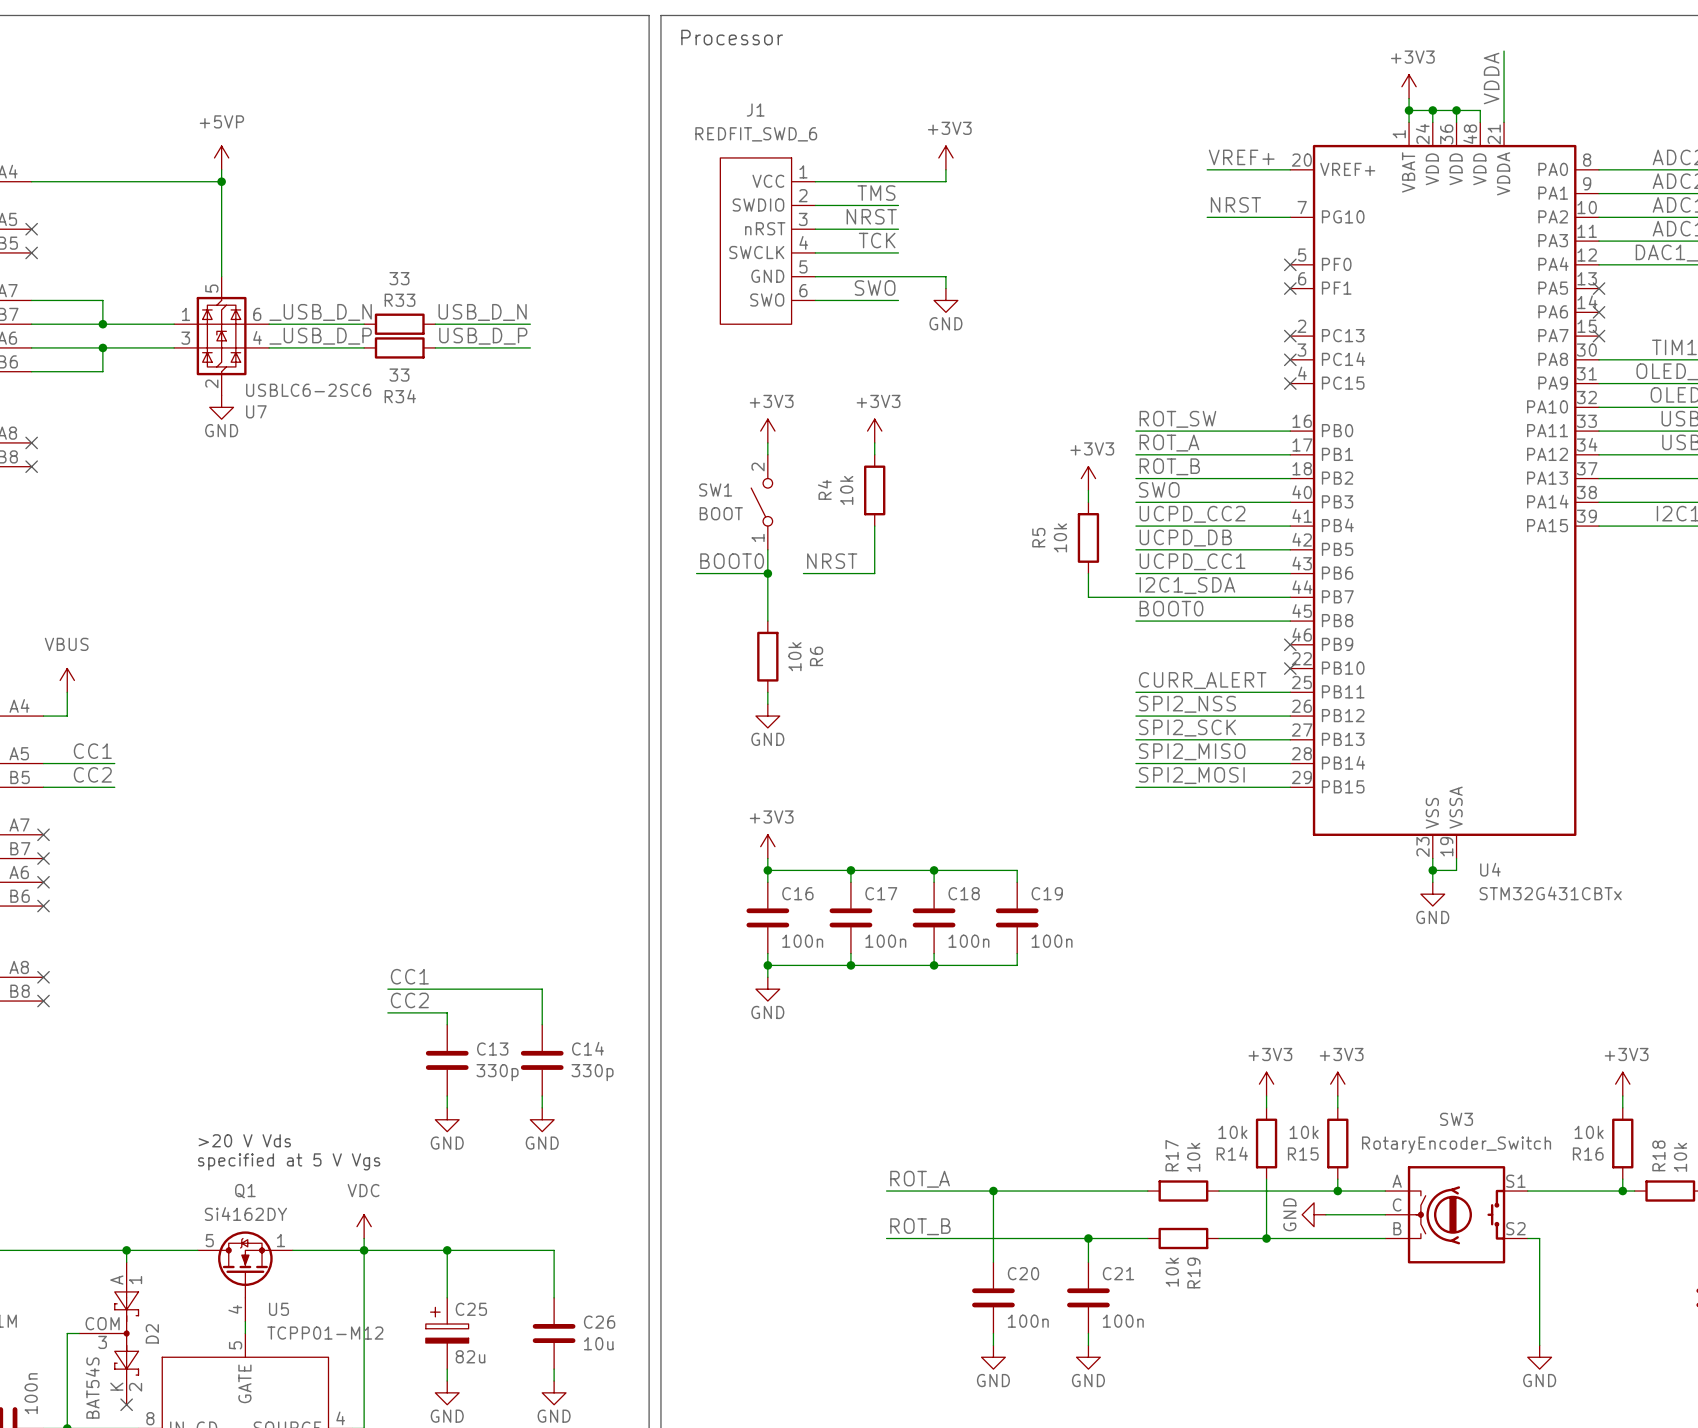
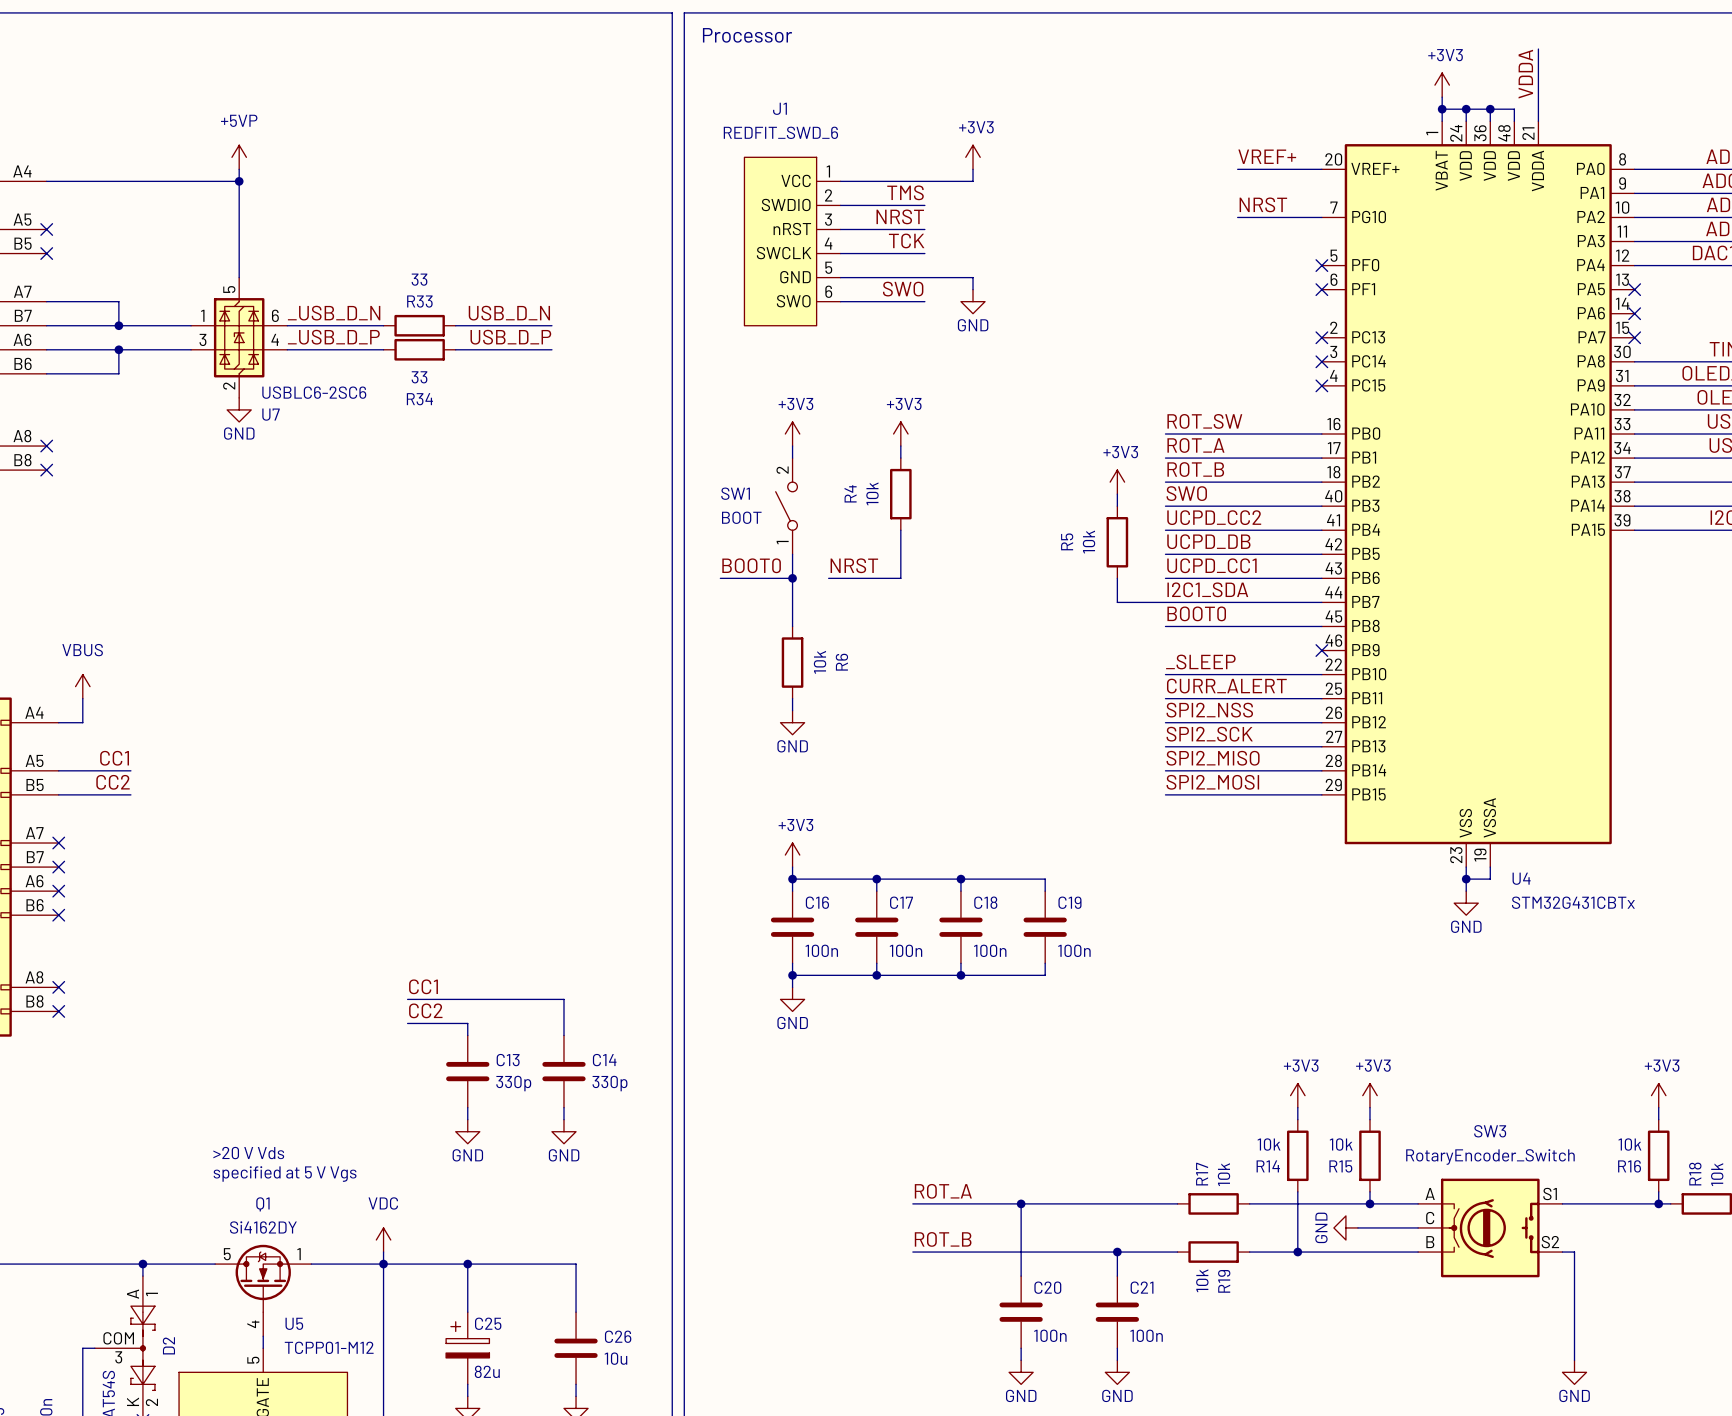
label: none -> _SLEEP (1200, 662)
wire: none -> (1165, 674) (1321, 674)
no-connect mark: (1290, 668) -> none

